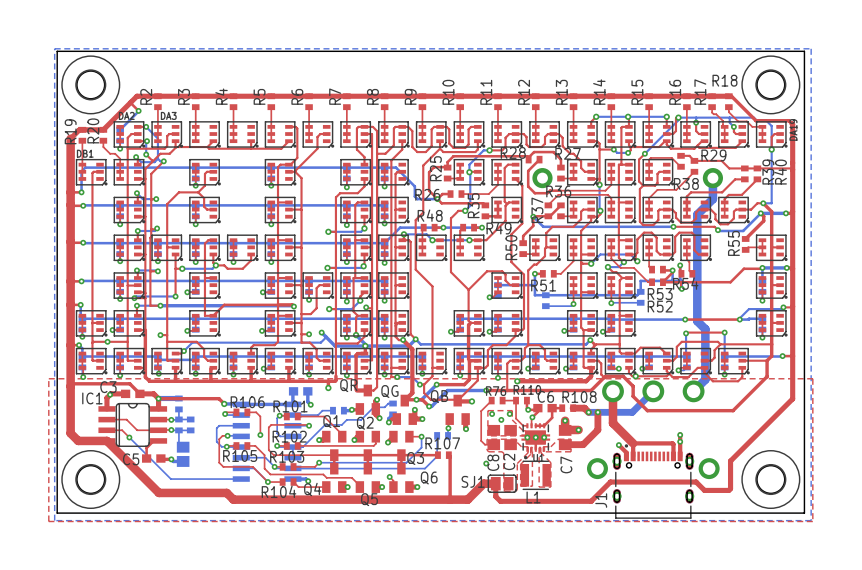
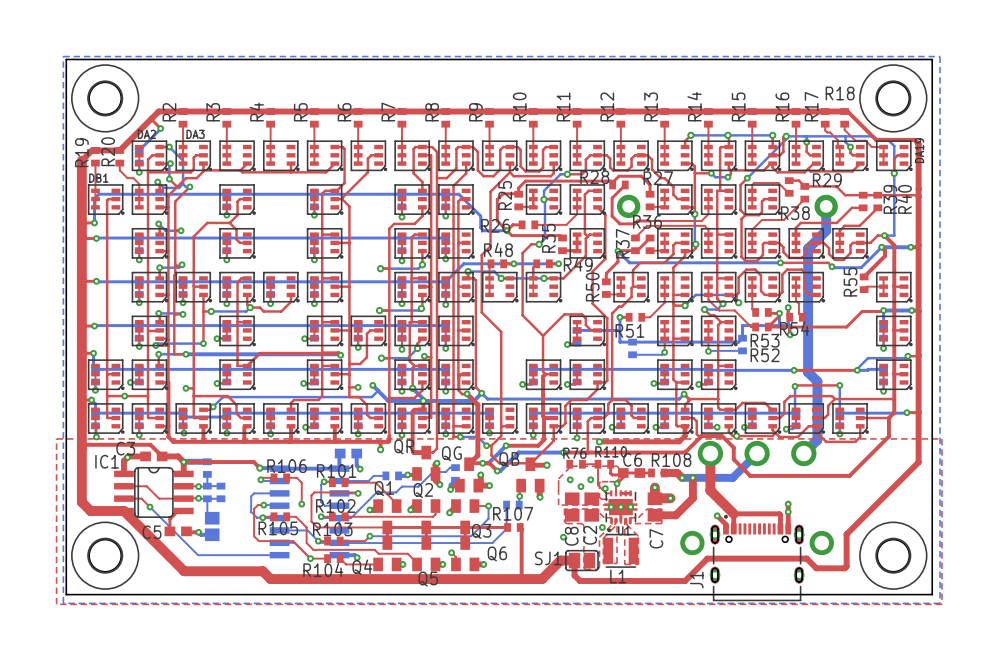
top track: (491, 400) (481, 411) (481, 440) (484, 444) (493, 444) -> none
top track: (552, 408) (552, 417) (544, 425) -> (639, 472) (629, 472)
via position: (528, 409) -> (605, 488)
top zone outline: (523, 430) (512, 419) (512, 410) (487, 410) (487, 435) -> (606, 499) (599, 497) (599, 482) (616, 481) (618, 478) (618, 468) (616, 466) (571, 466) (558, 478) (558, 505) (565, 505)
via: none -> (602, 527)

